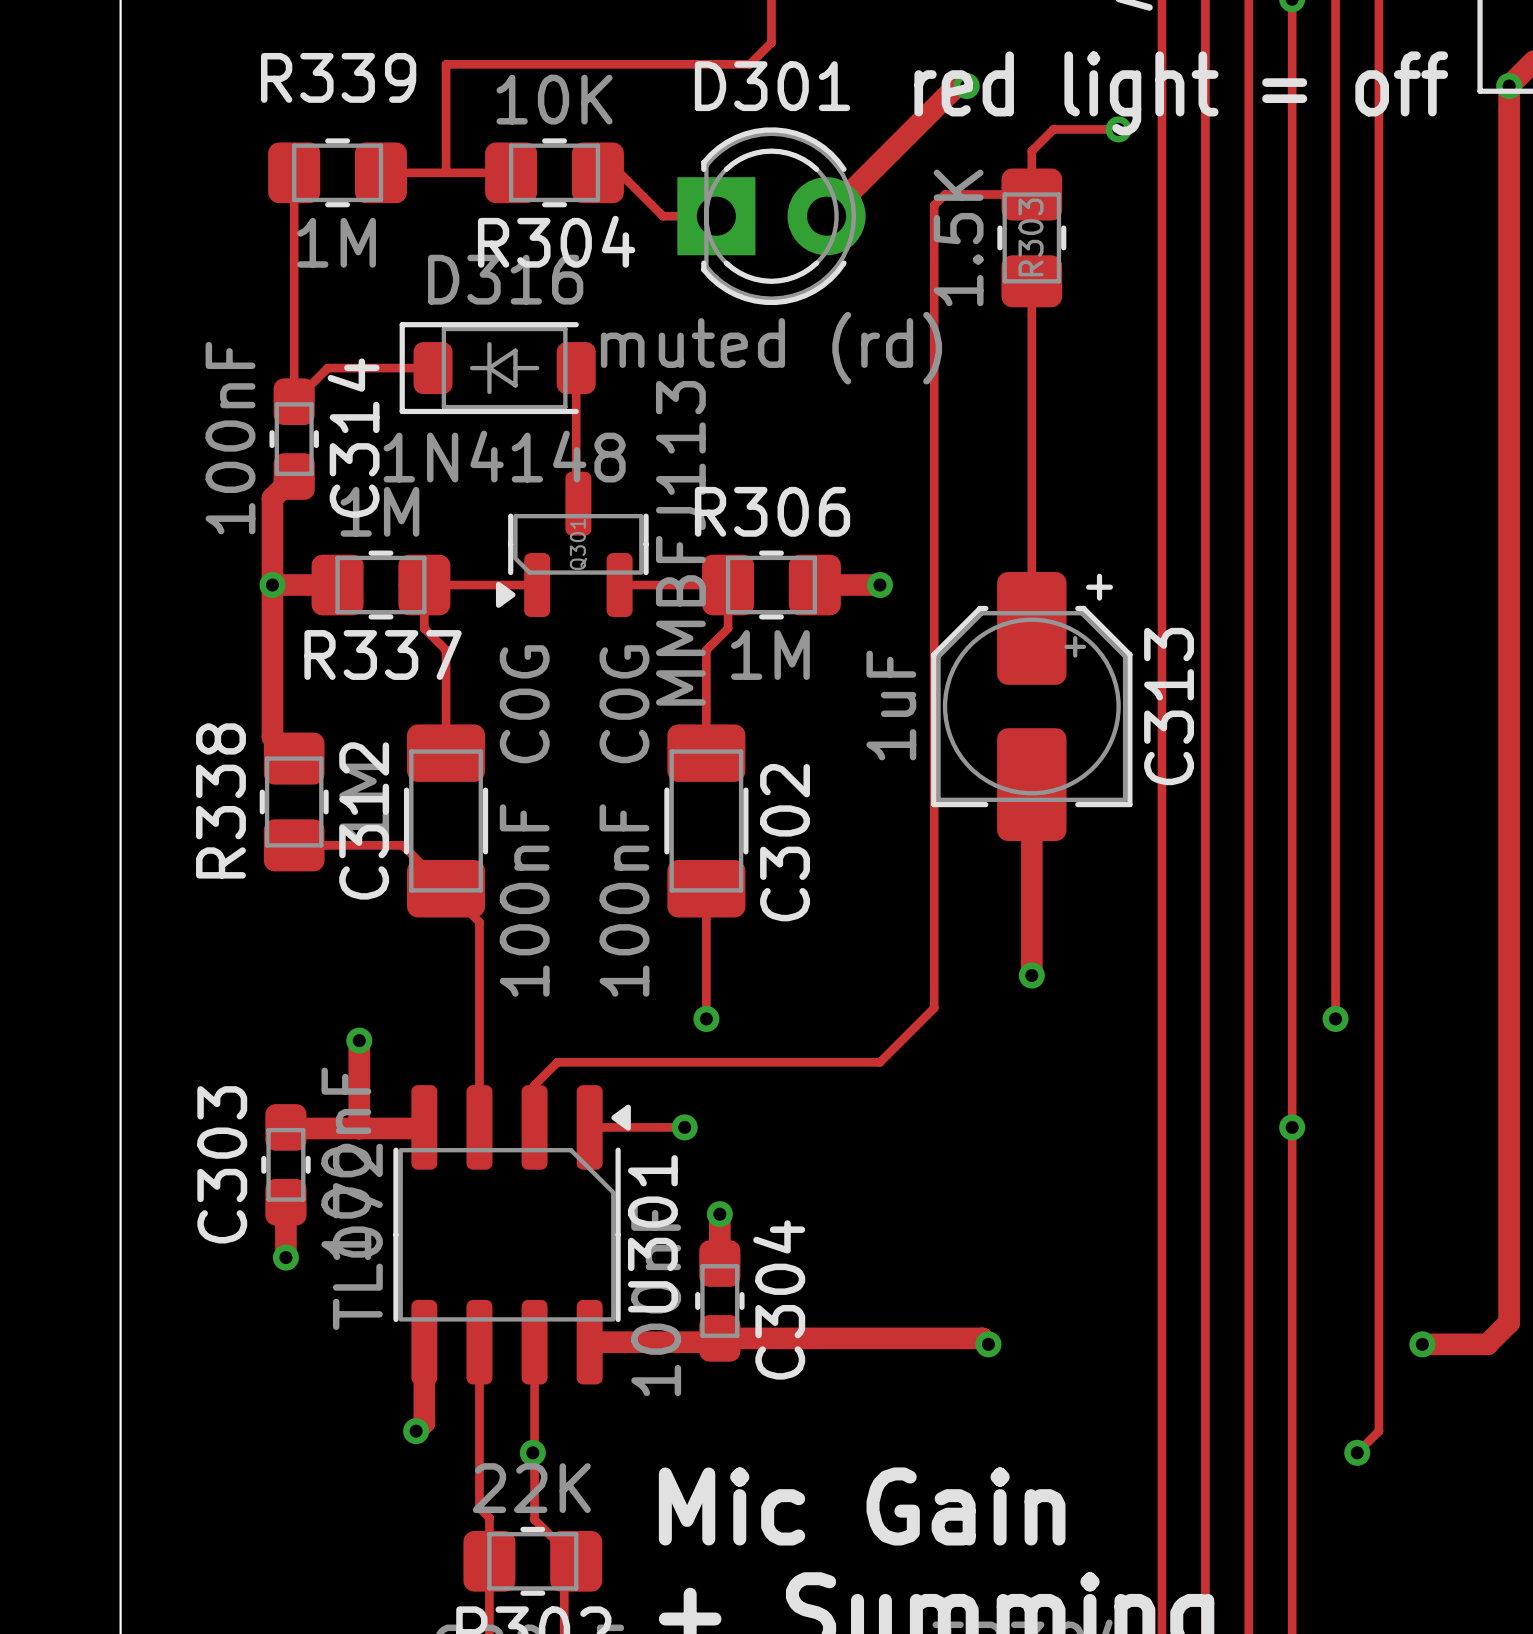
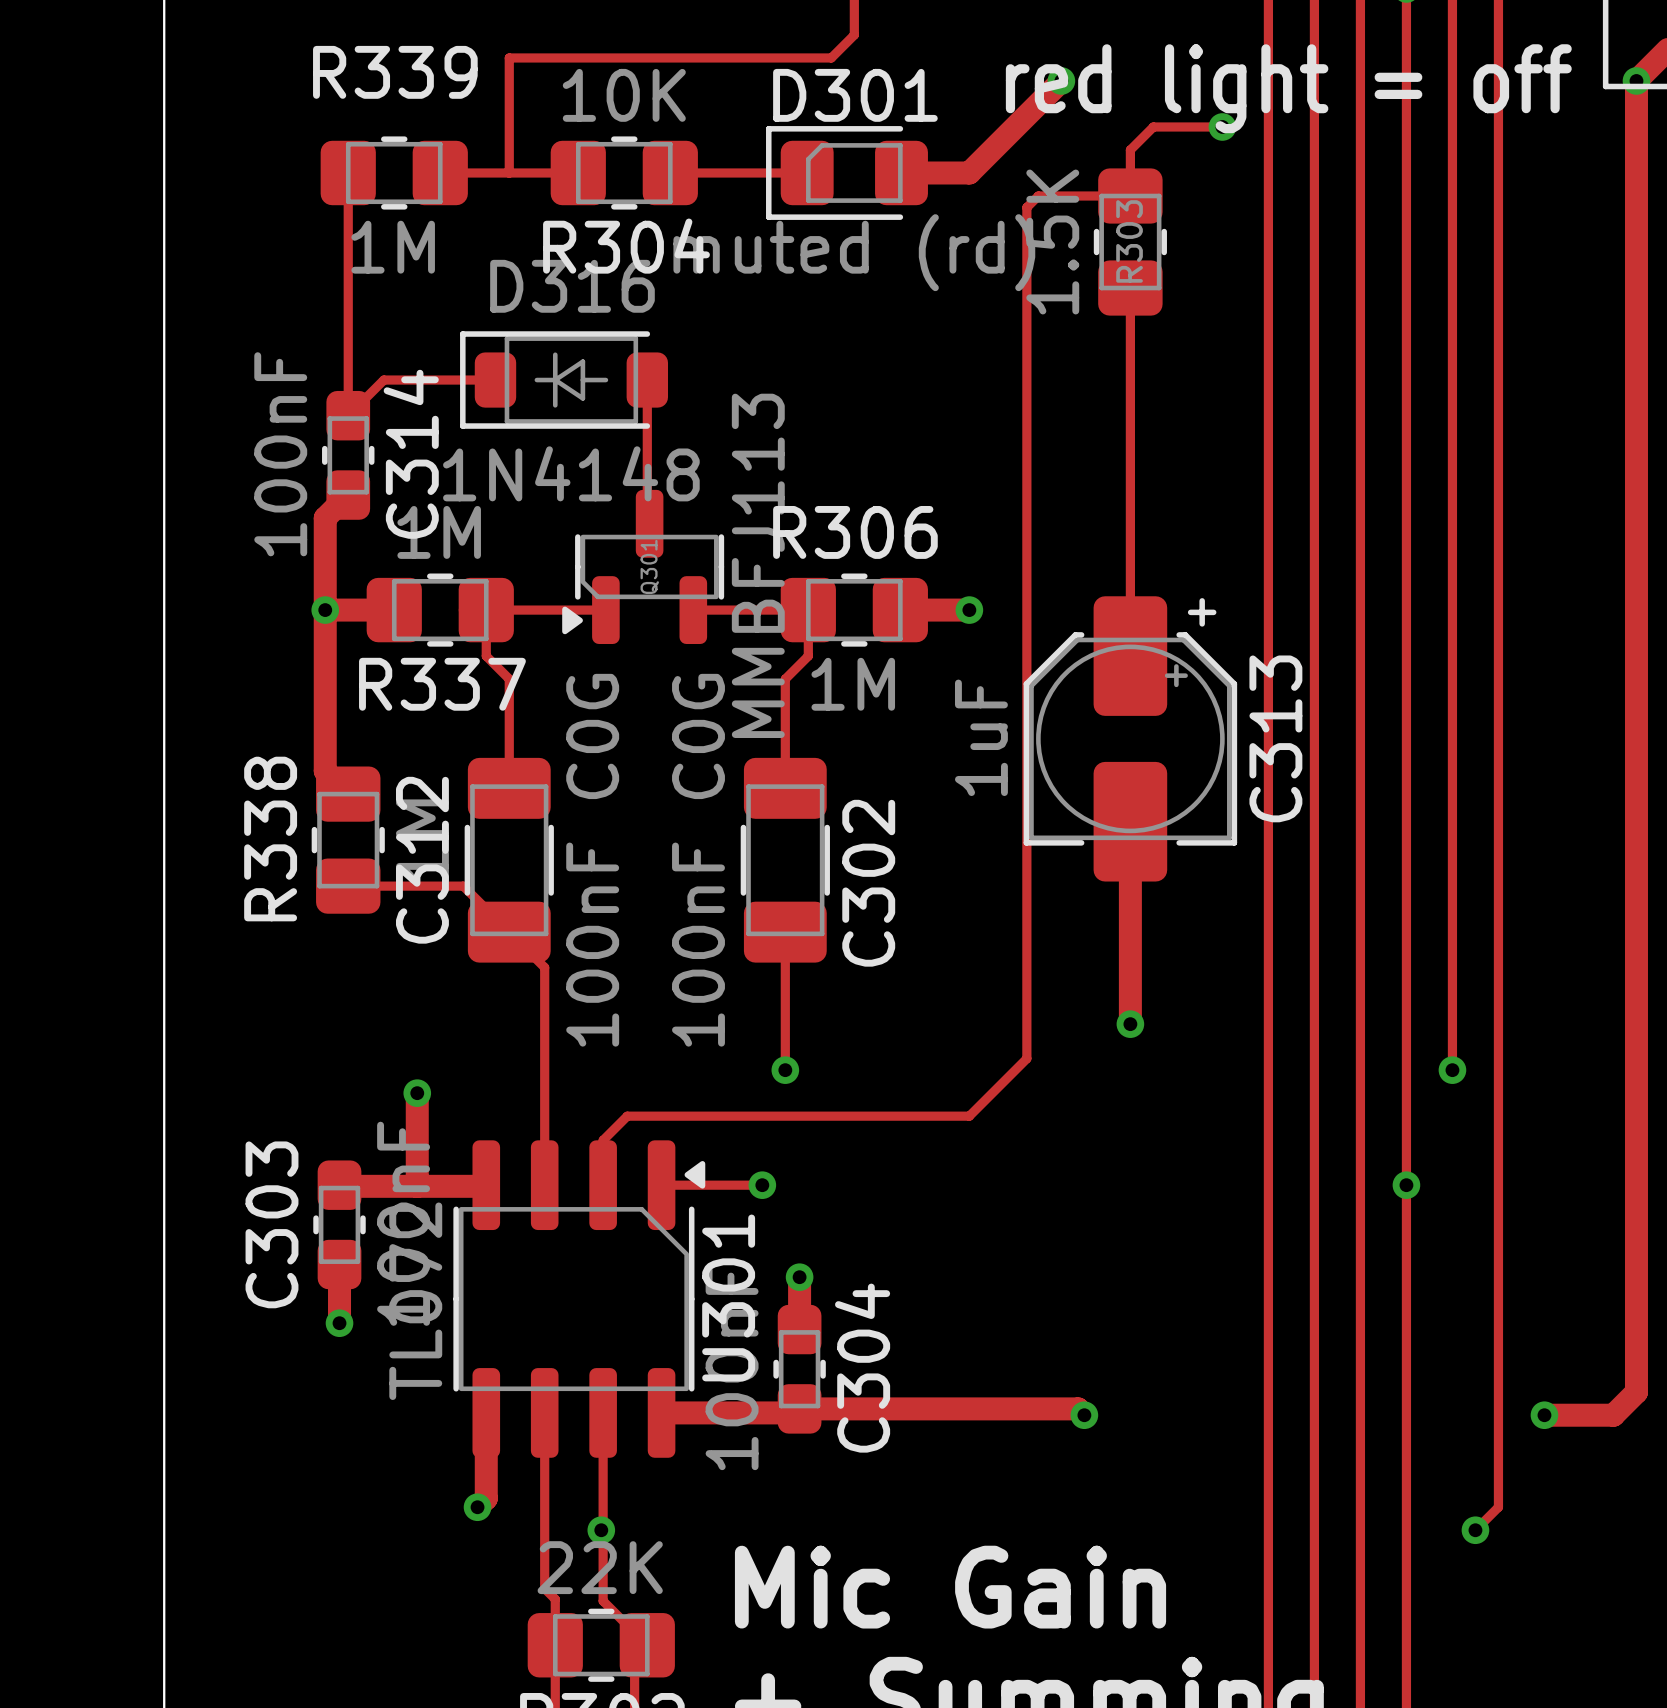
track: (966, 86) (956, 86) (826, 216) -> (1061, 80) (969, 172) (901, 172)
D301 footprint: [677, 127, 866, 306] -> [766, 126, 928, 220]
track: (619, 172) (663, 216) (716, 216) -> (693, 172) (807, 172)

